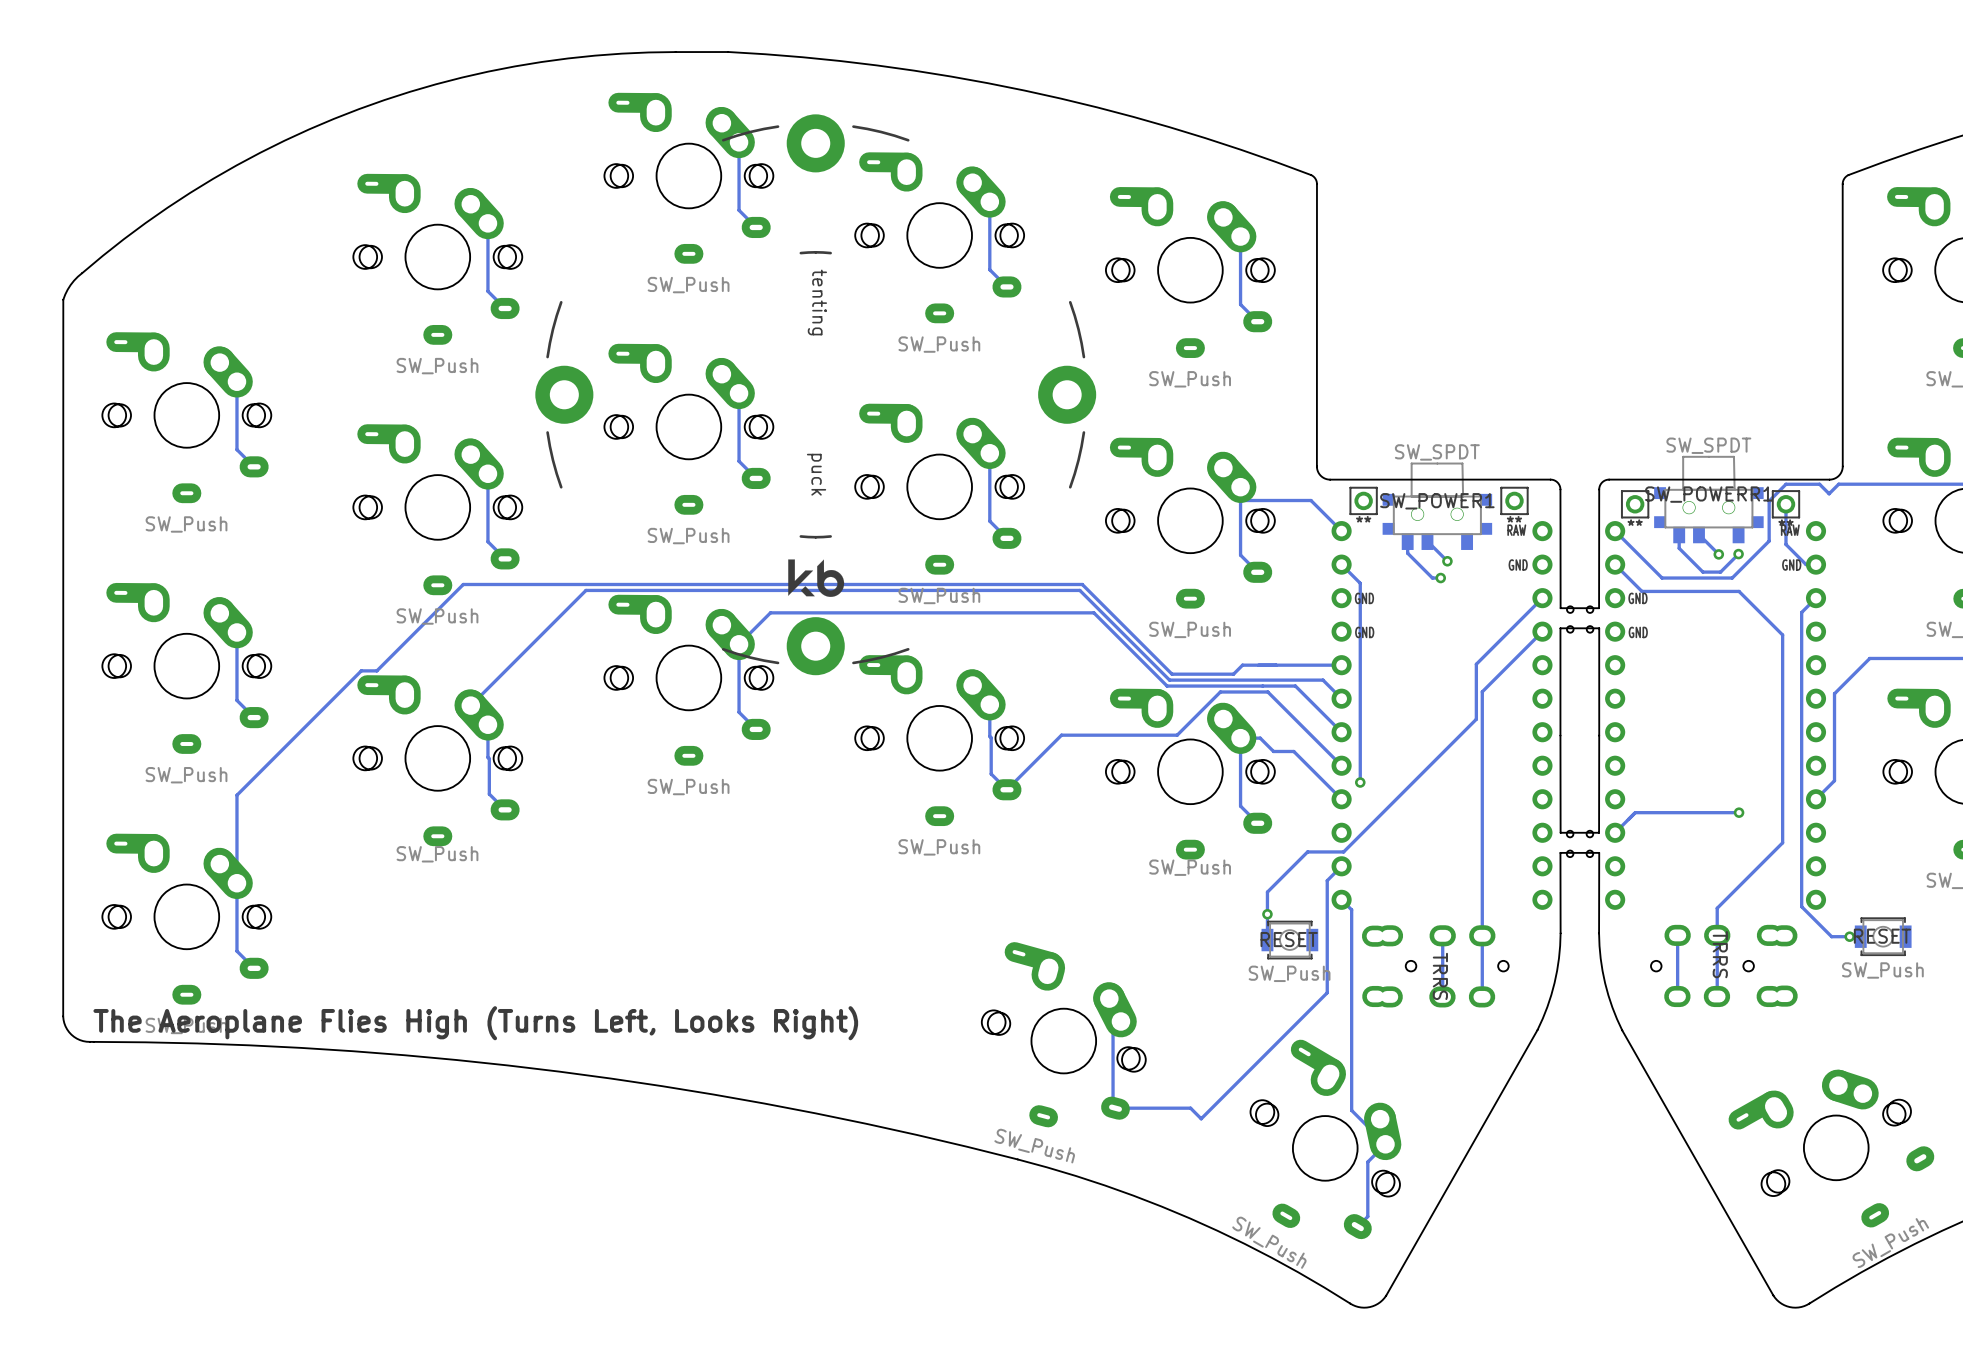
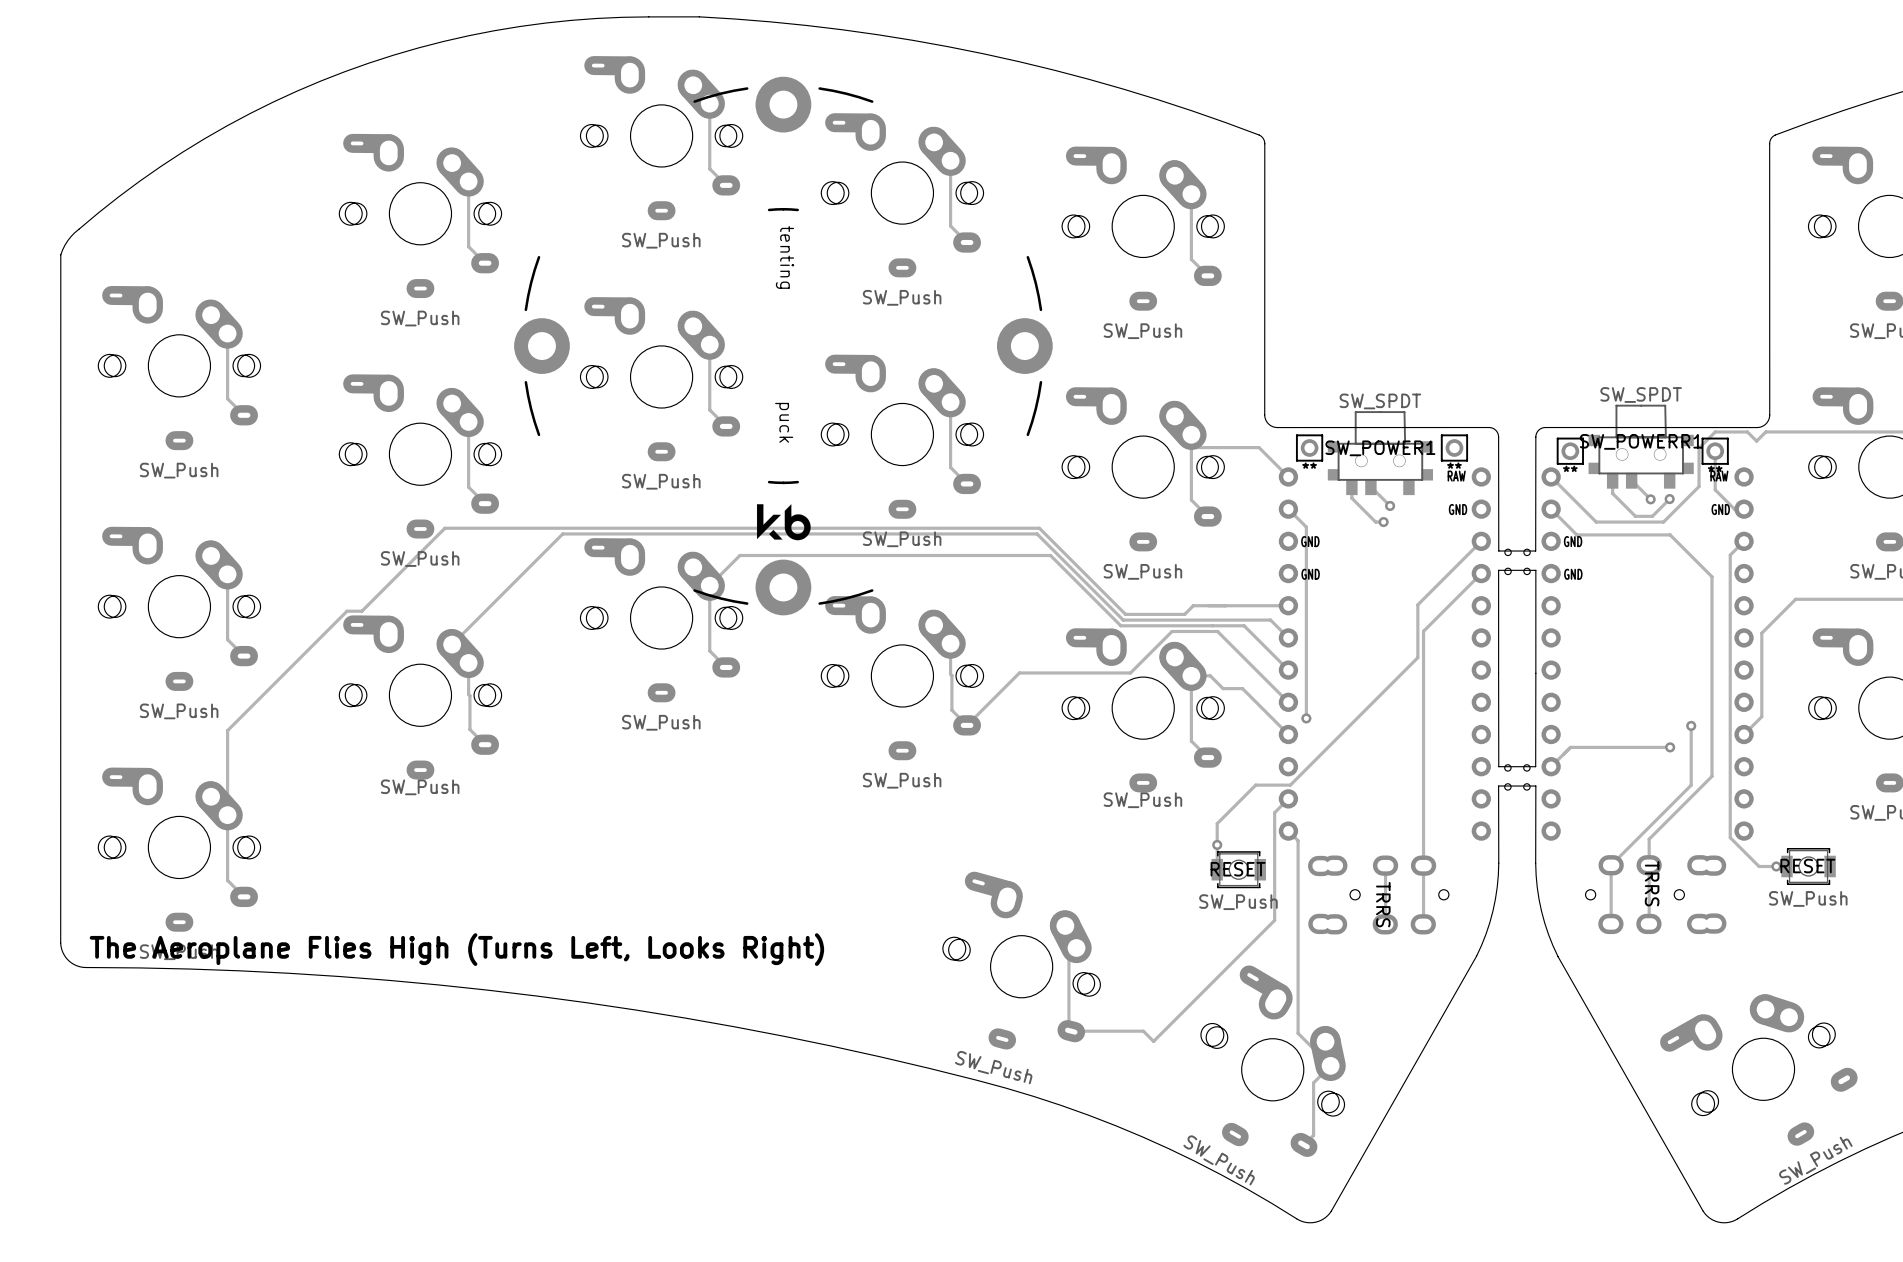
track: none -> (1691, 725) (1691, 785) (1611, 865)
via: none -> (1691, 725)

